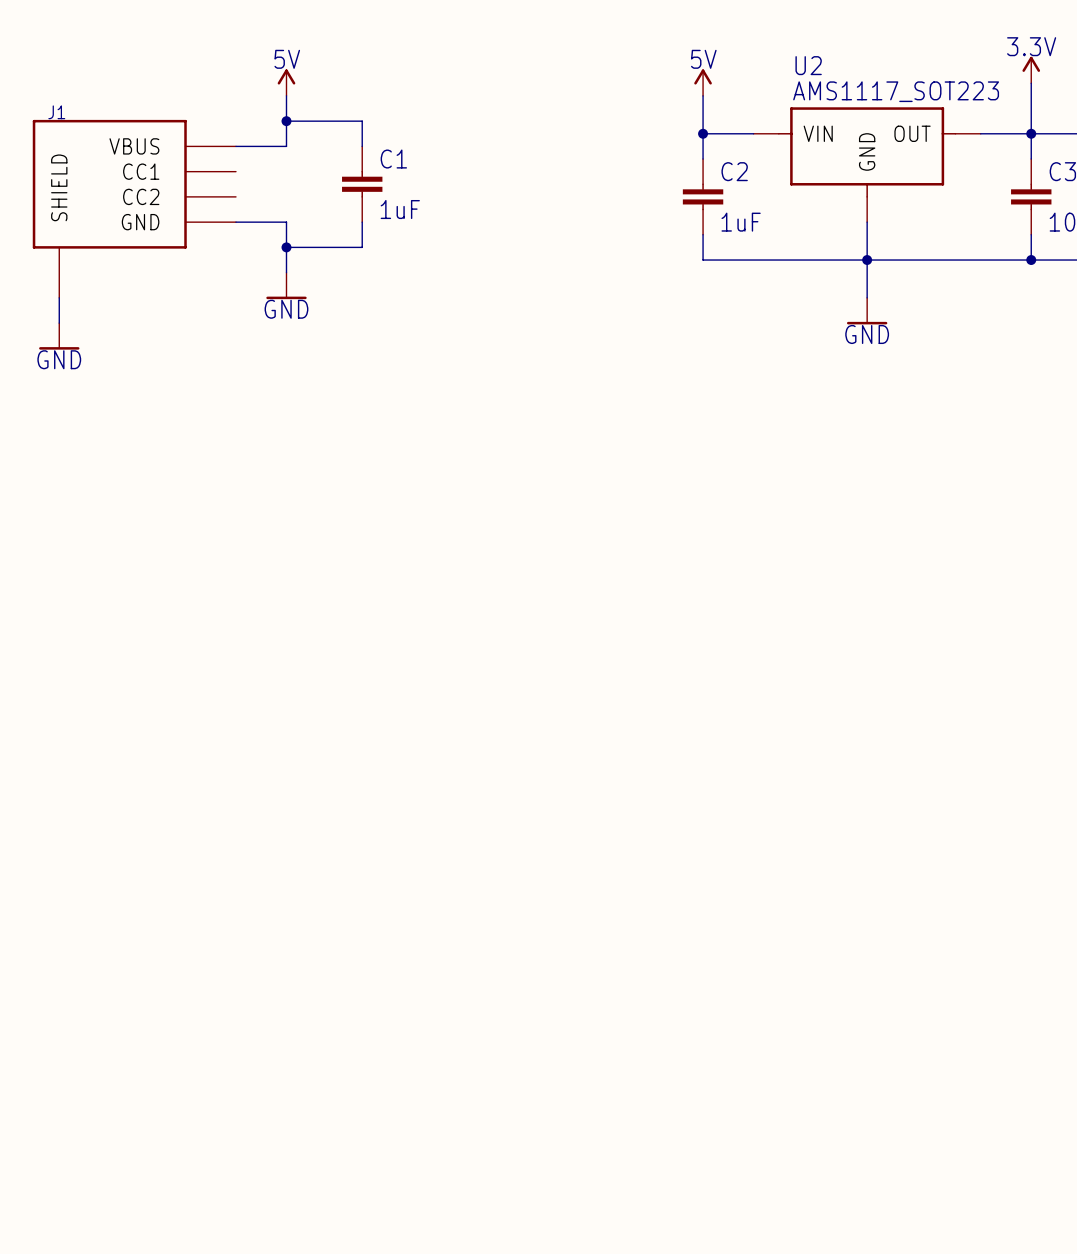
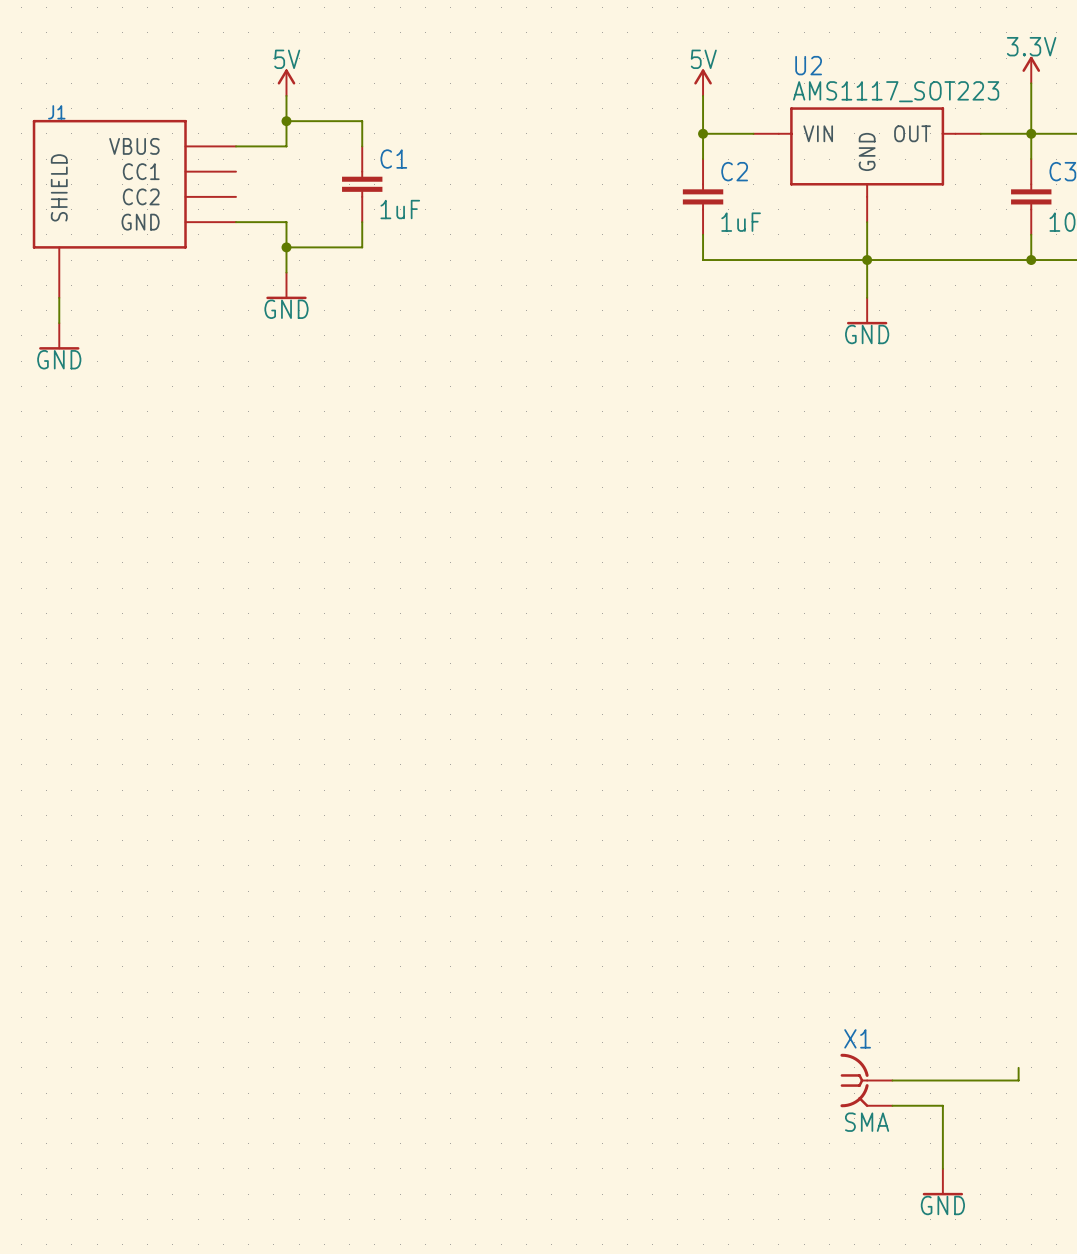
wire: none -> (1018, 1067) (1018, 1080) (892, 1080)
X1: none -> SMA (866, 1080)
wire: none -> (892, 1105) (942, 1105) (942, 1168)
power symbol: none -> GND (942, 1182)

